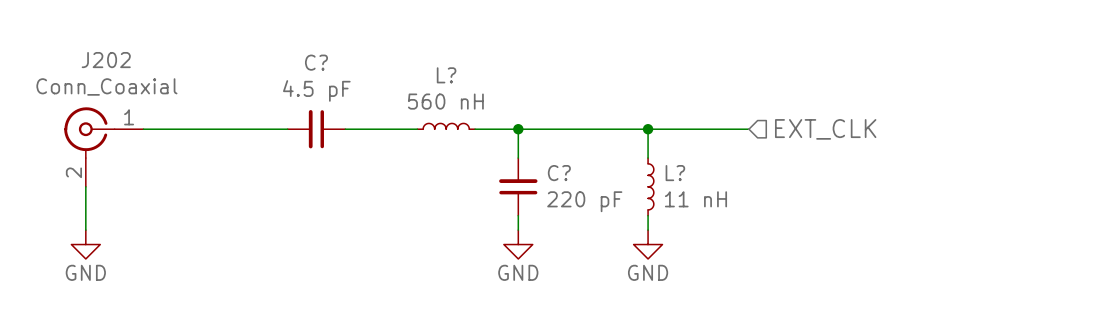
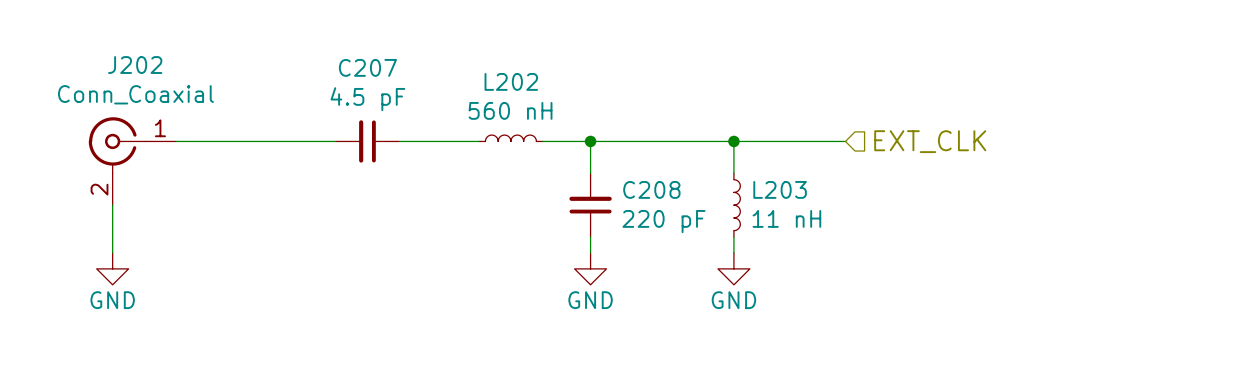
C? name: C? (316, 62) -> C207 (367, 67)
L? name: L? (446, 75) -> L202 (511, 81)
C? name: C? (559, 173) -> C208 (651, 189)
L? name: L? (675, 173) -> L203 (780, 189)

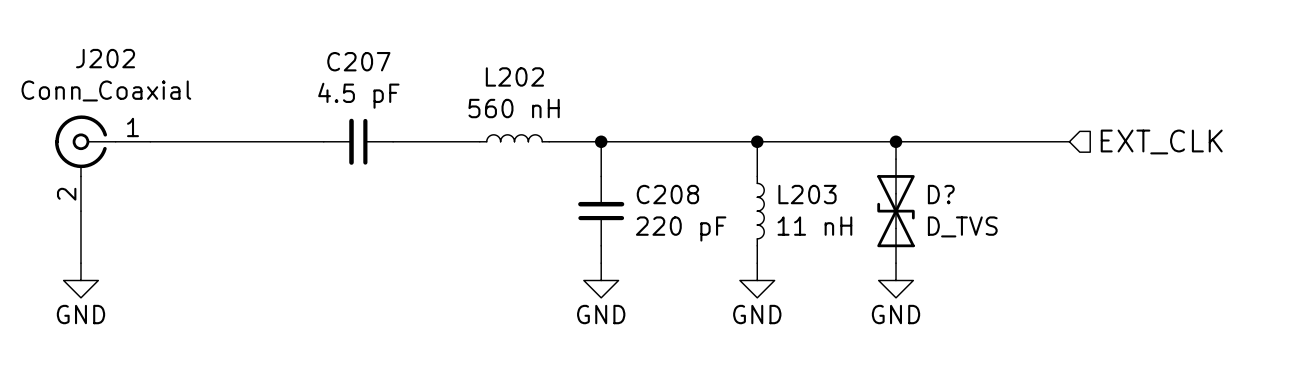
wire: none -> (878, 141) (1069, 141)
wire: none -> (896, 141) (896, 159)
junction: none -> (896, 141)
hierarchical label position: EXT_CLK (930, 141) -> EXT_CLK (1161, 141)
D?: none -> D_TVS (896, 211)
power symbol: none -> GND (896, 280)

